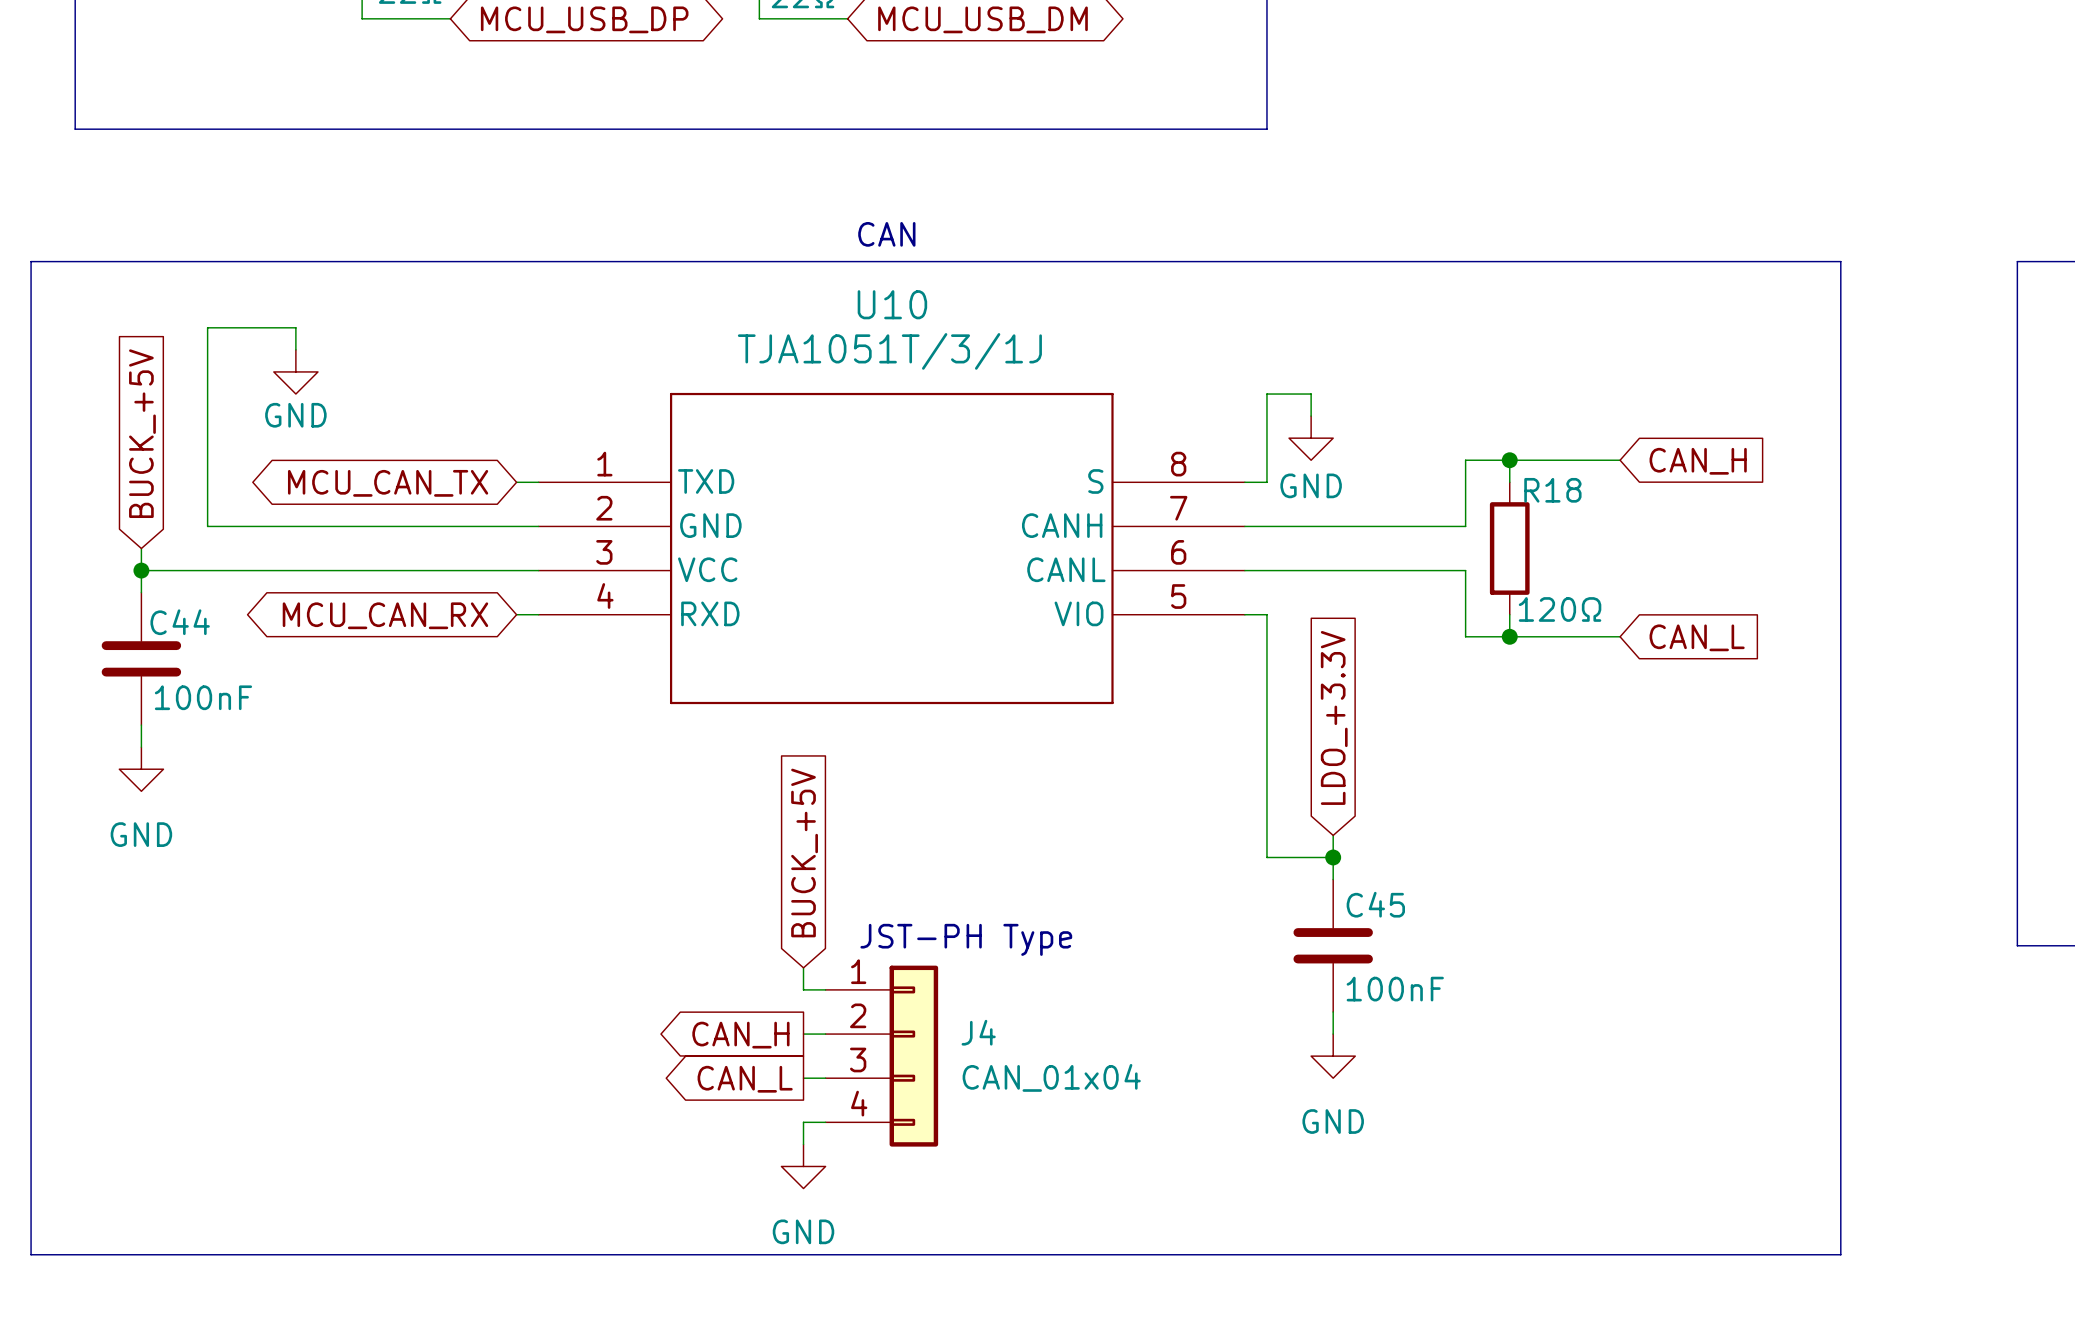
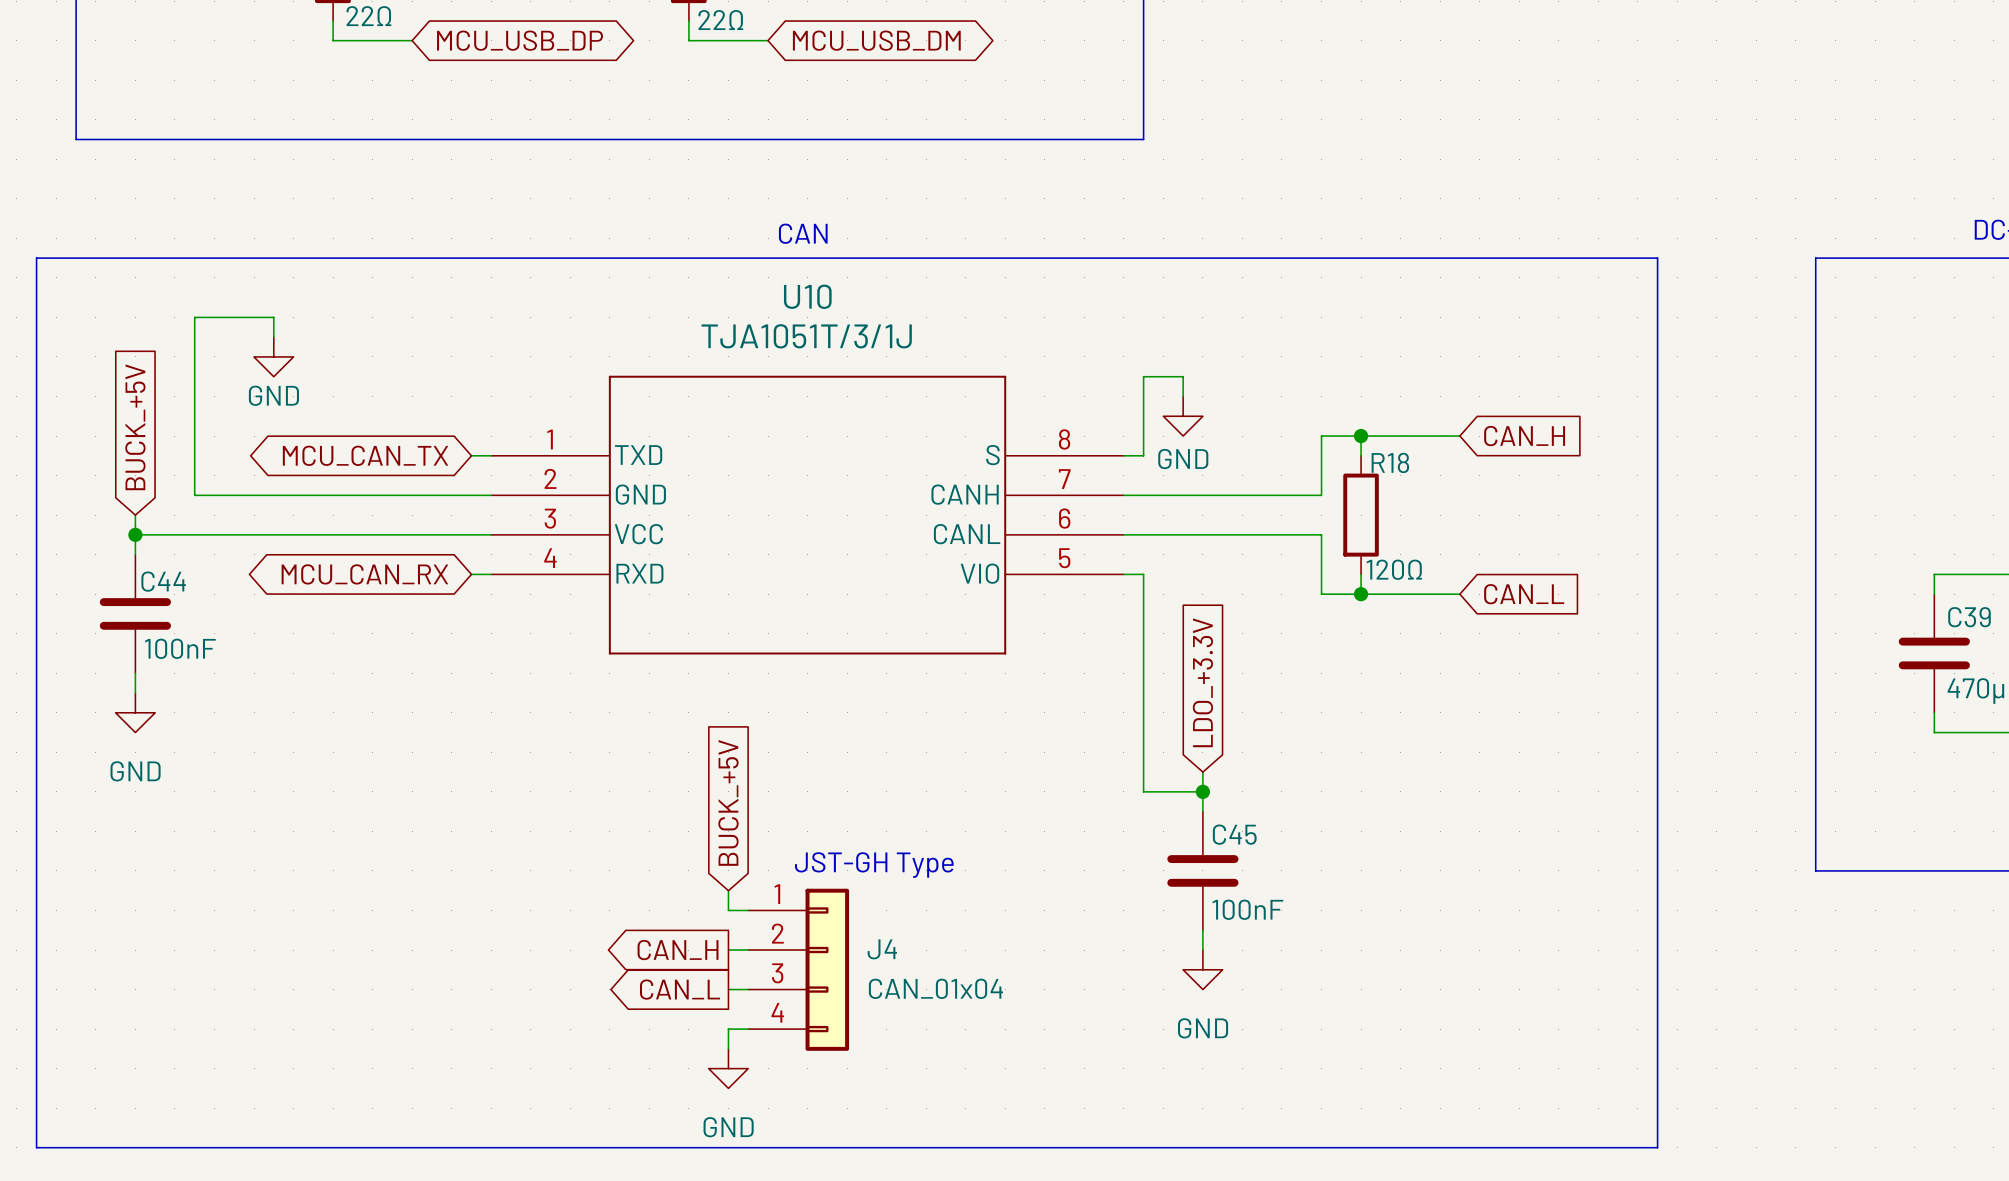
text: JST-PH Type (966, 939) -> JST-GH Type (874, 865)

